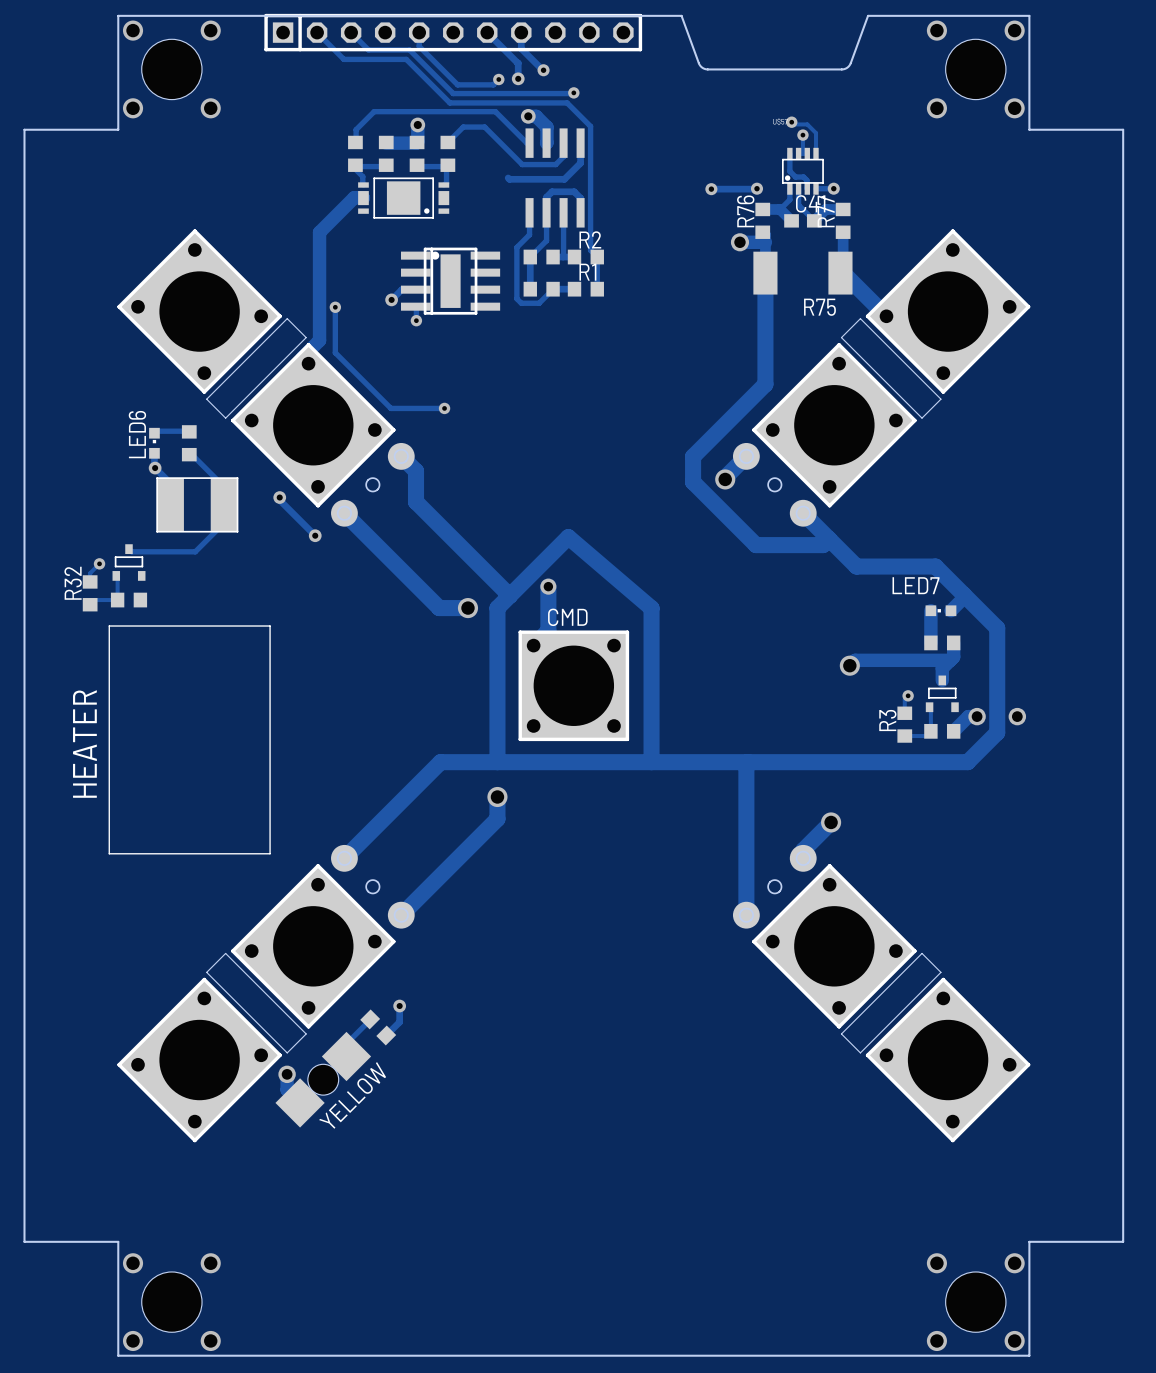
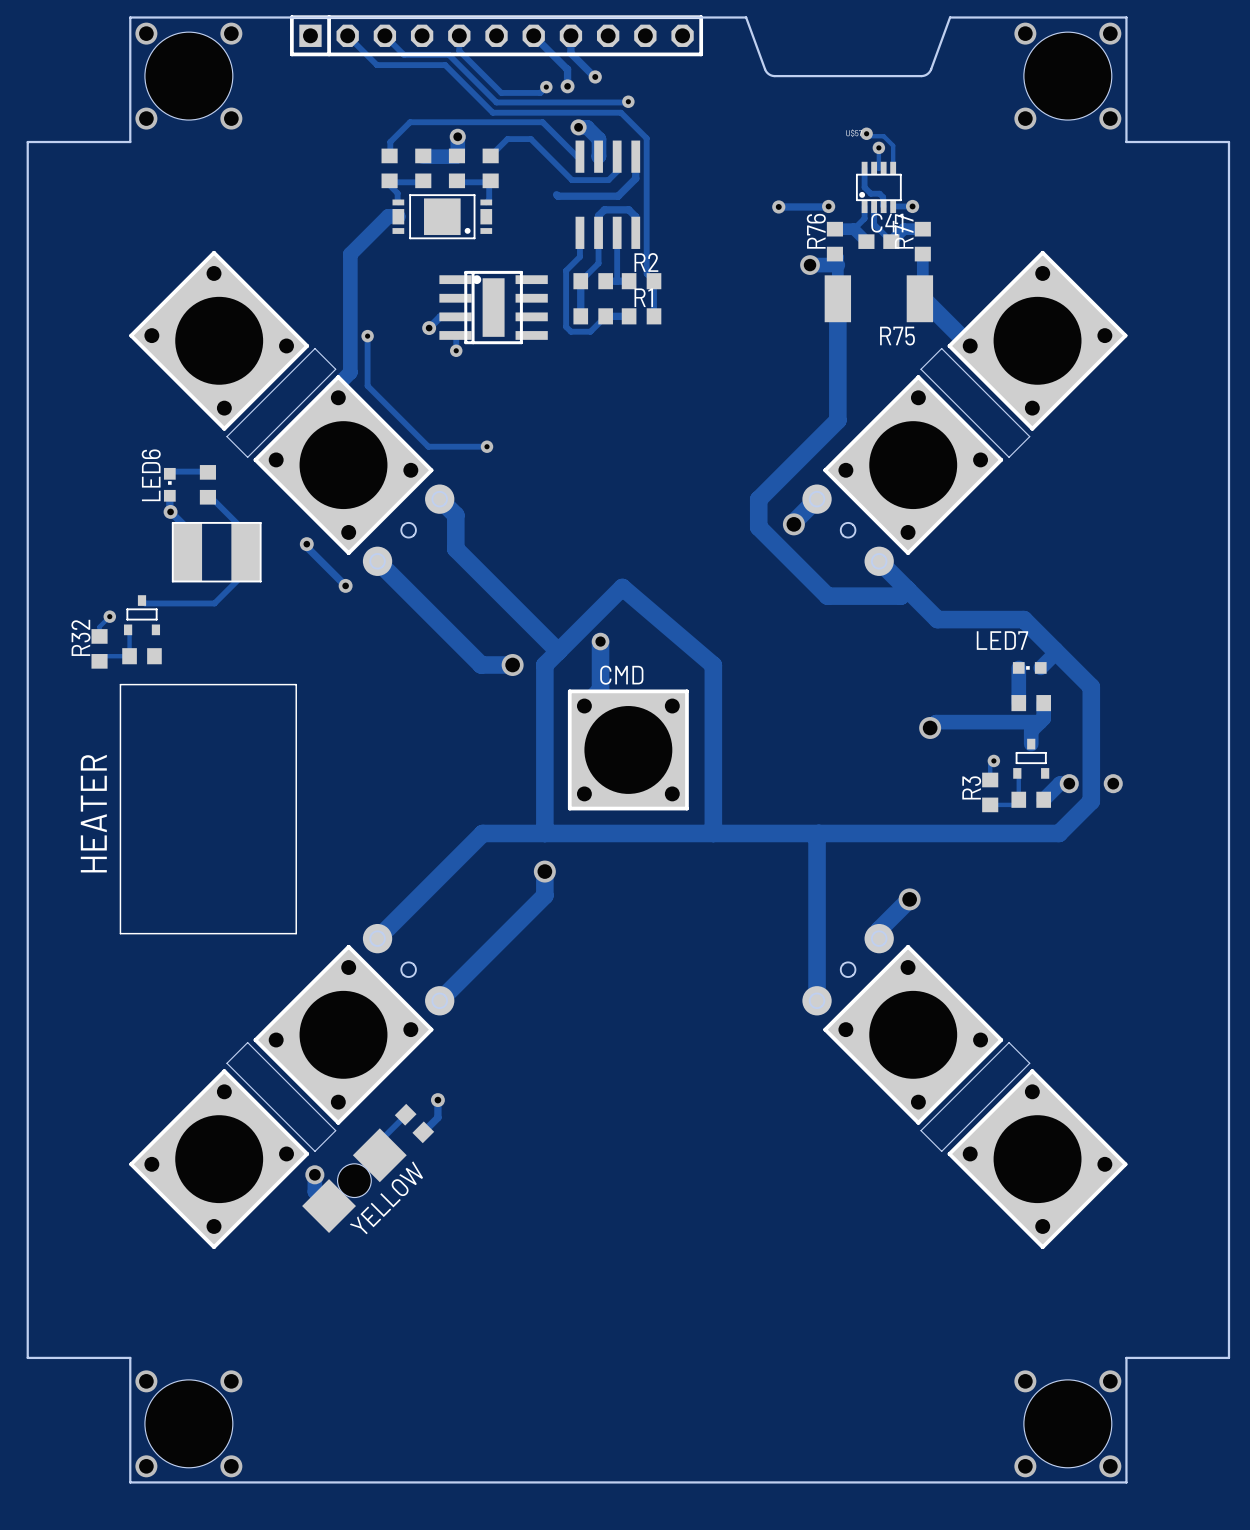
hole size: [141, 39, 203, 100] -> [144, 32, 233, 121]
hole size: [945, 39, 1006, 100] -> [1023, 32, 1112, 121]
hole size: [141, 1271, 203, 1333] -> [144, 1379, 233, 1468]
hole size: [945, 1271, 1006, 1333] -> [1023, 1379, 1112, 1468]

